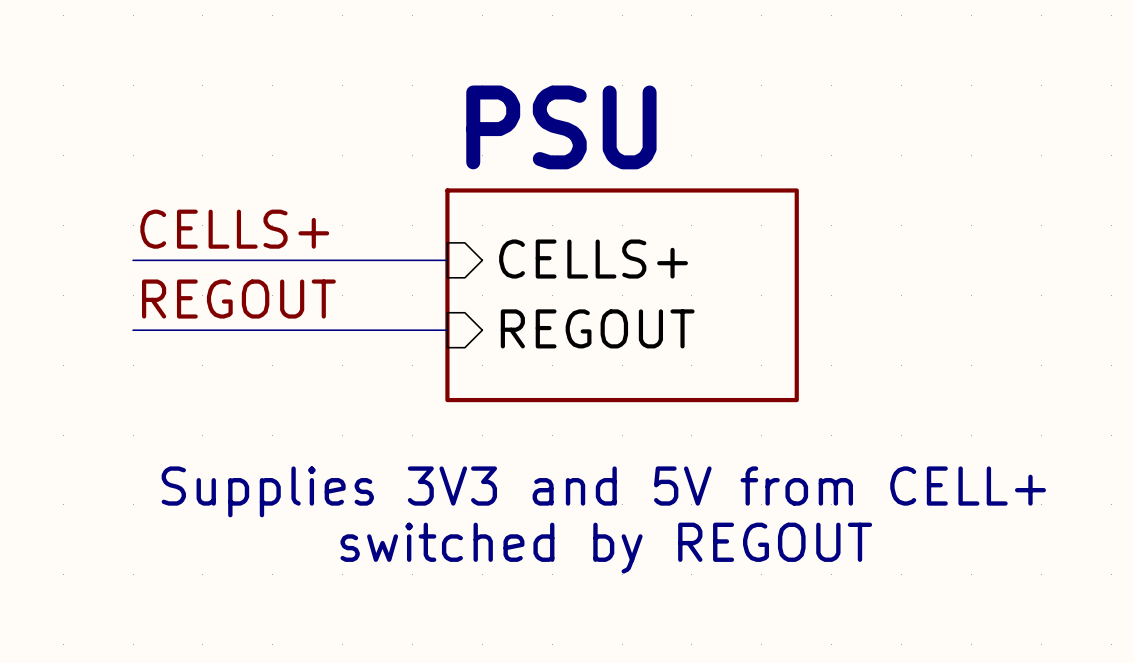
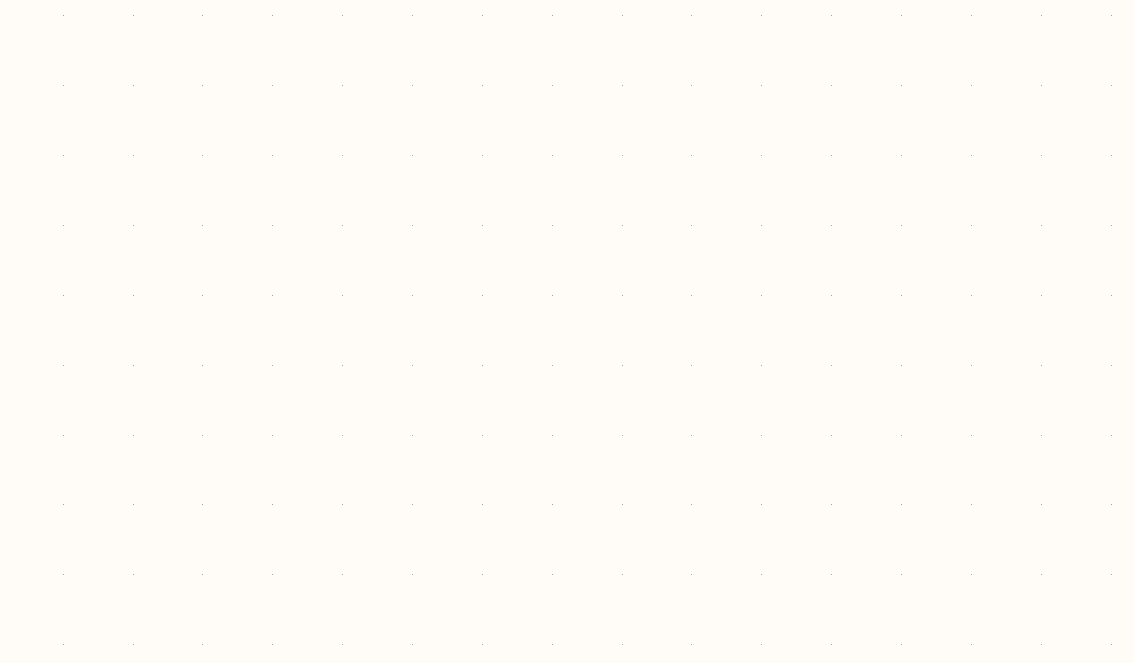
label: CELLS+ (234, 229) -> none
sheet pin: CELLS+ (593, 259) -> none
wire: (133, 260) (447, 260) -> none
sheet PSU: (622, 295) -> none
label: REGOUT (238, 299) -> none
sheet pin: REGOUT (597, 328) -> none
wire: (133, 330) (447, 330) -> none
text: Supplies 3V3 and 5V from CELL+ (603, 491) -> none
text: switched by REGOUT (606, 548) -> none

